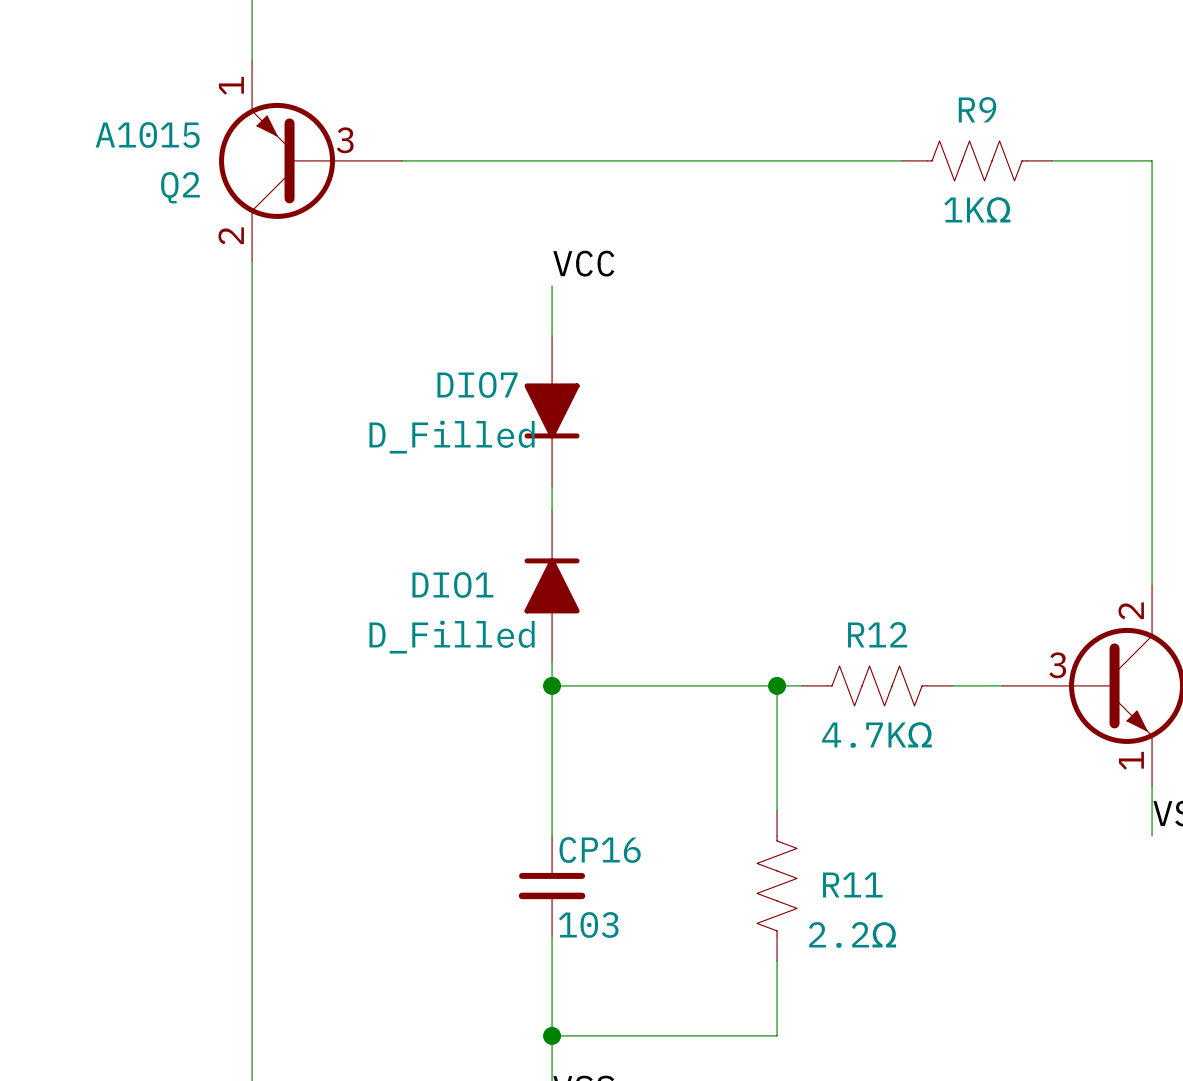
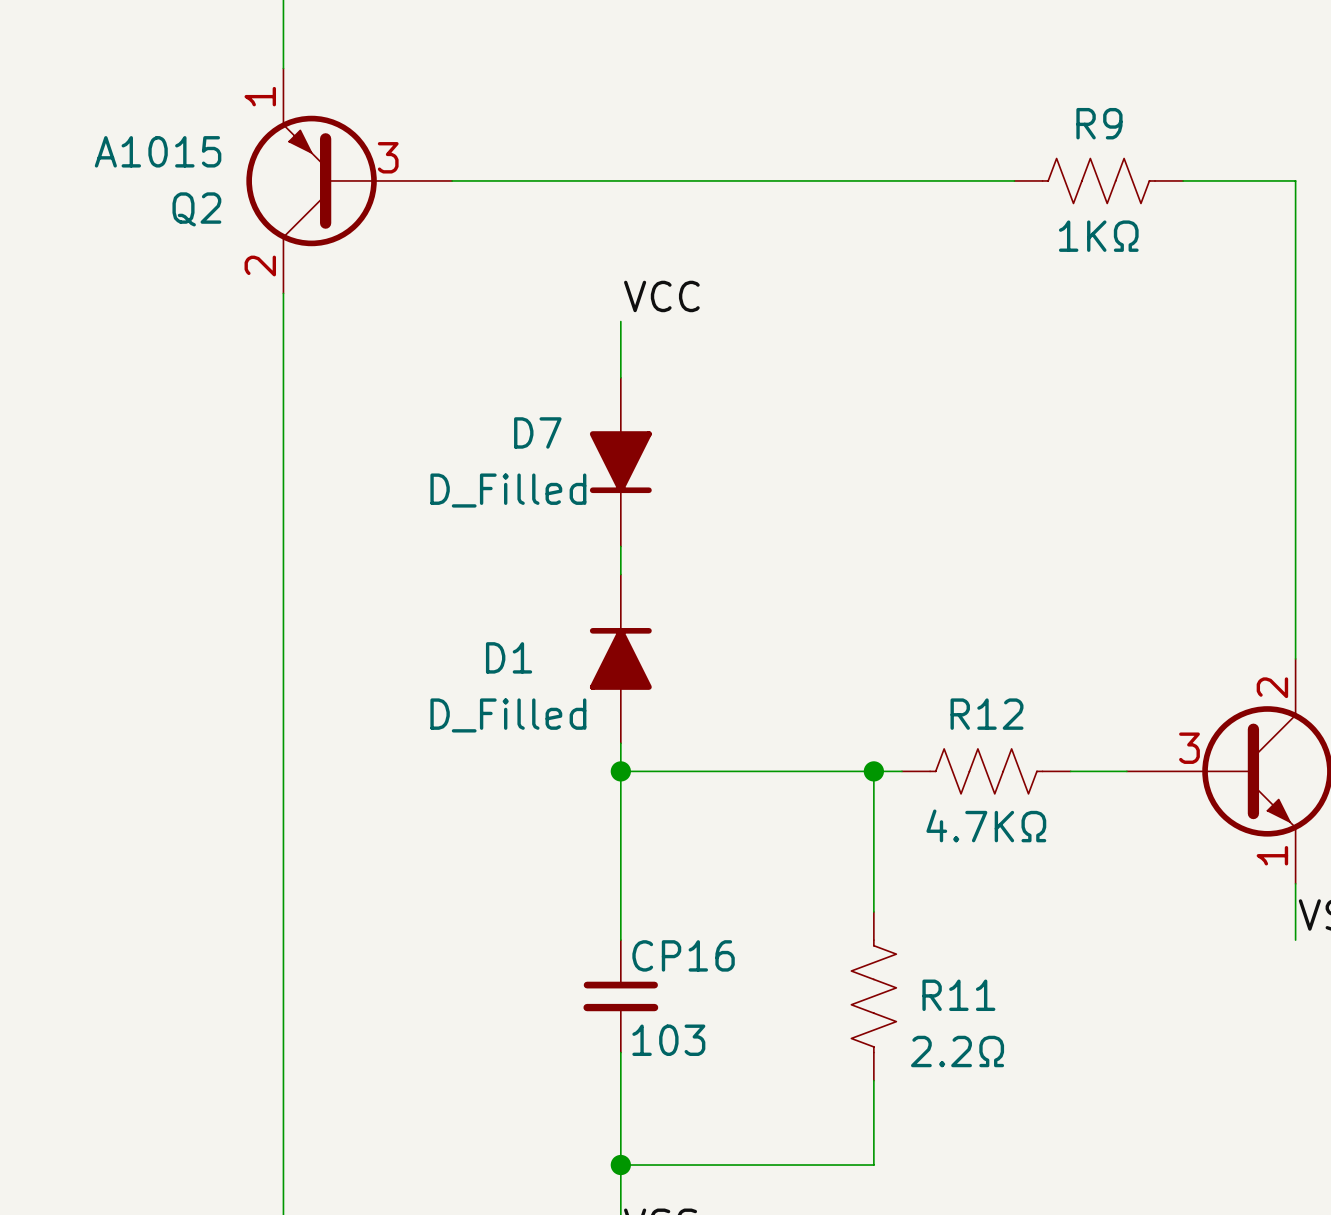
DIO7 name: DIO7 (477, 384) -> D7 (537, 432)
DIO1 name: DIO1 (452, 584) -> D1 (509, 657)

